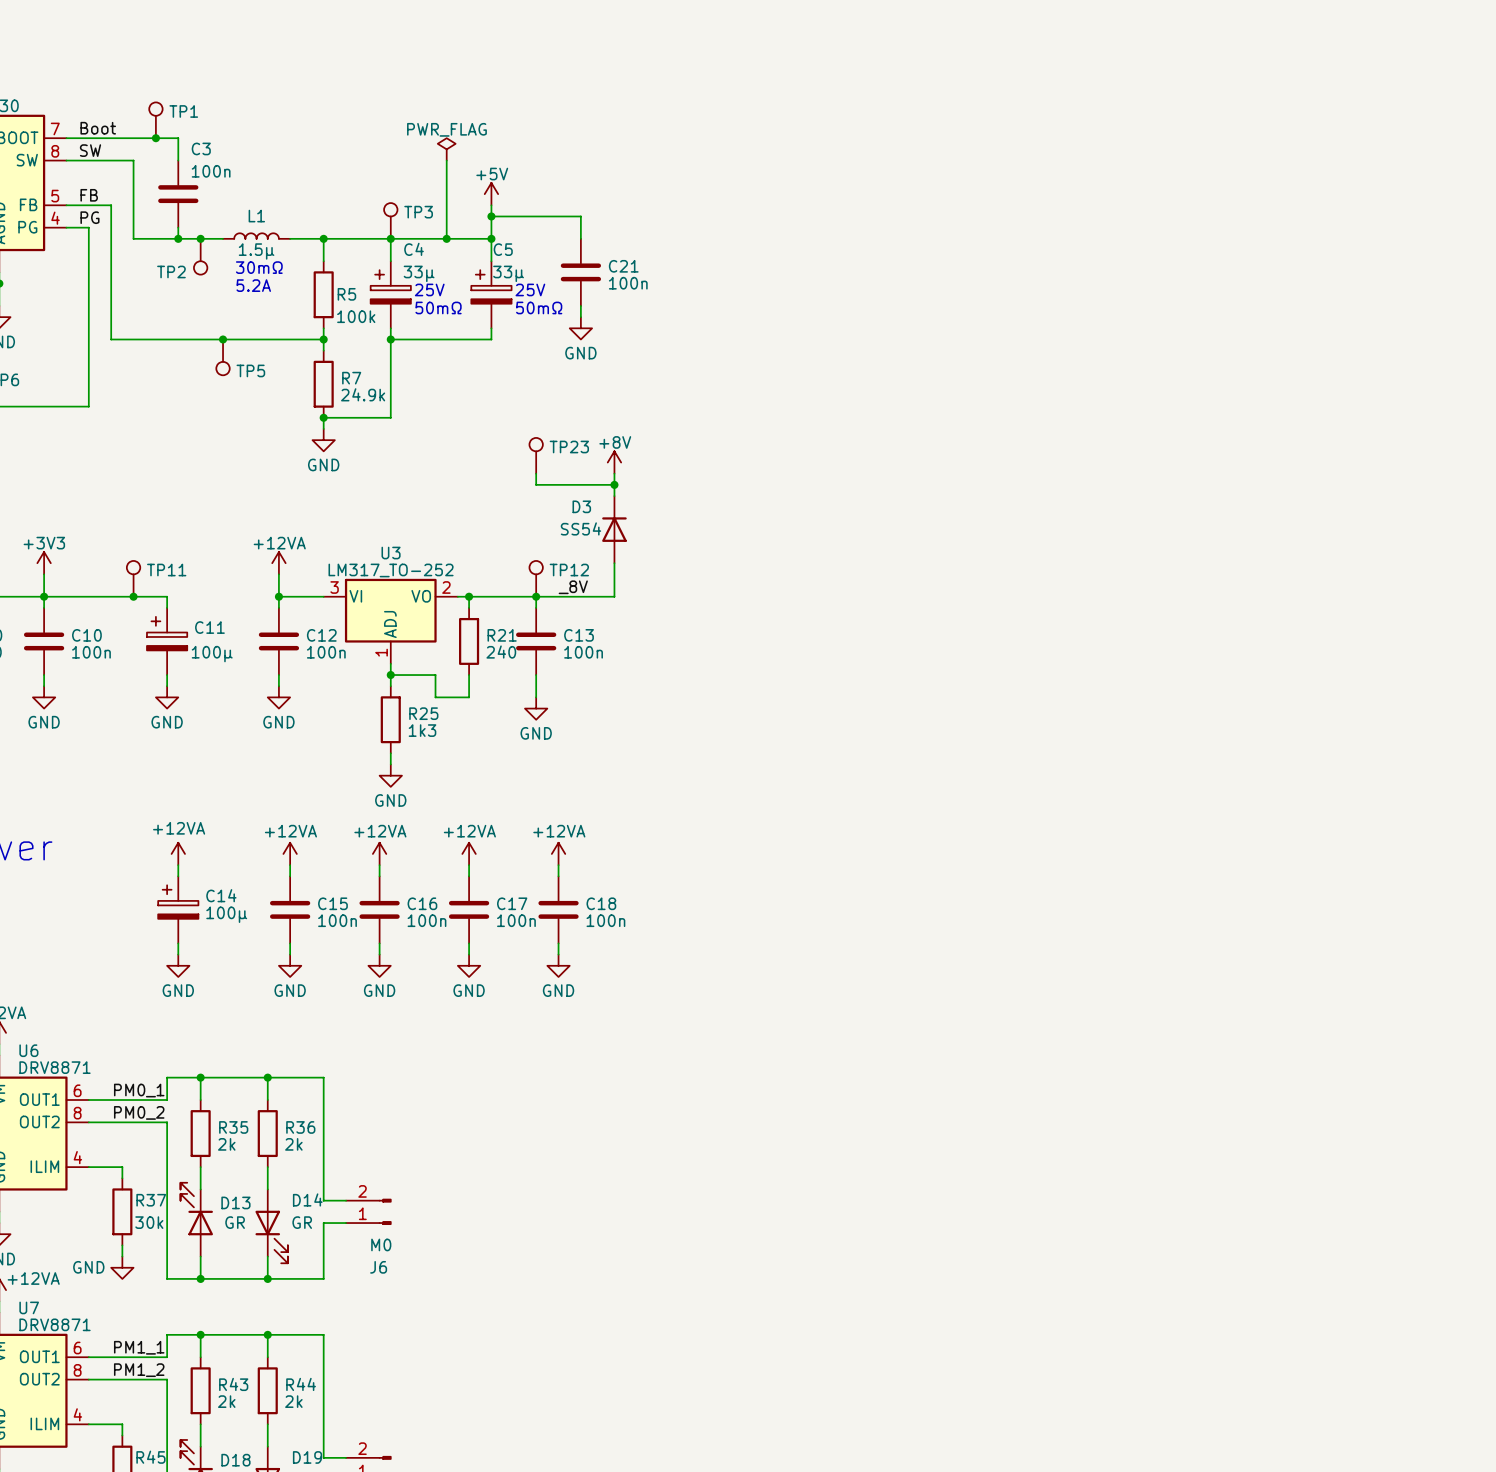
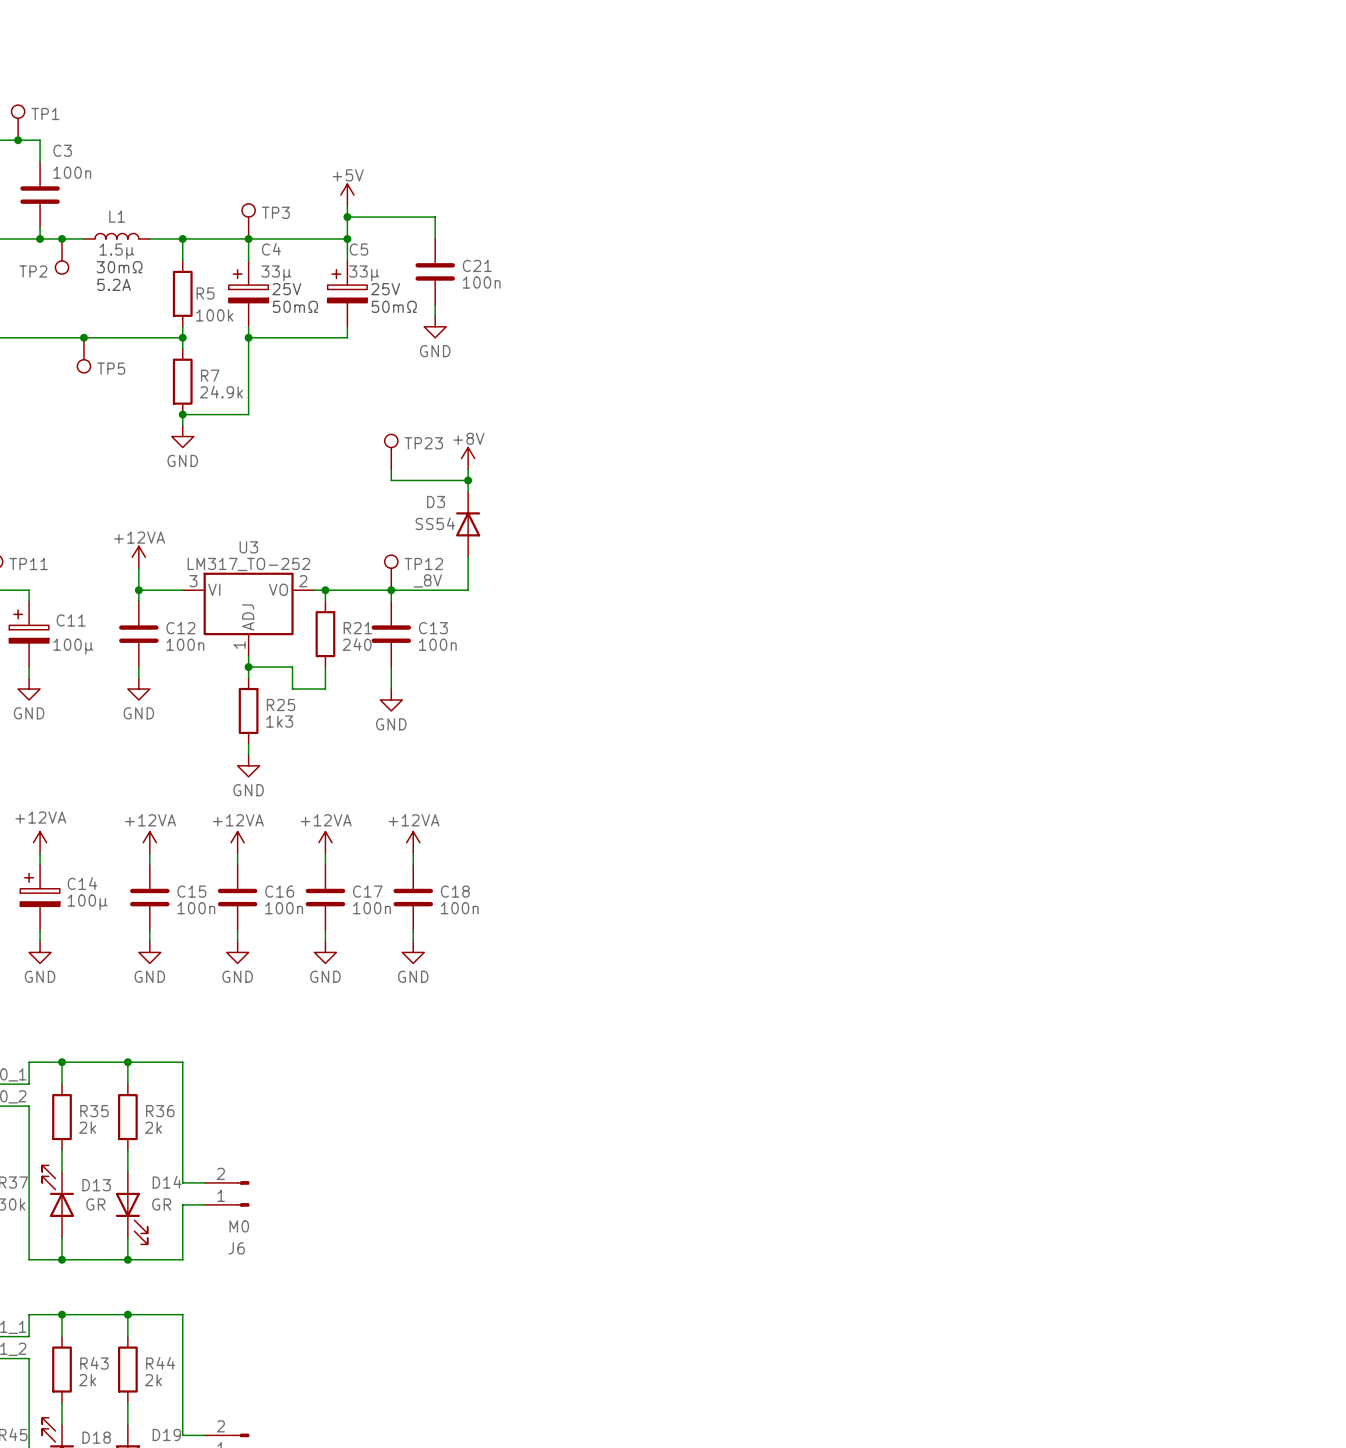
power symbol: PWR_FLAG (446, 149) -> none
wire: (446, 160) (446, 238) -> none
junction: (446, 238) -> none

